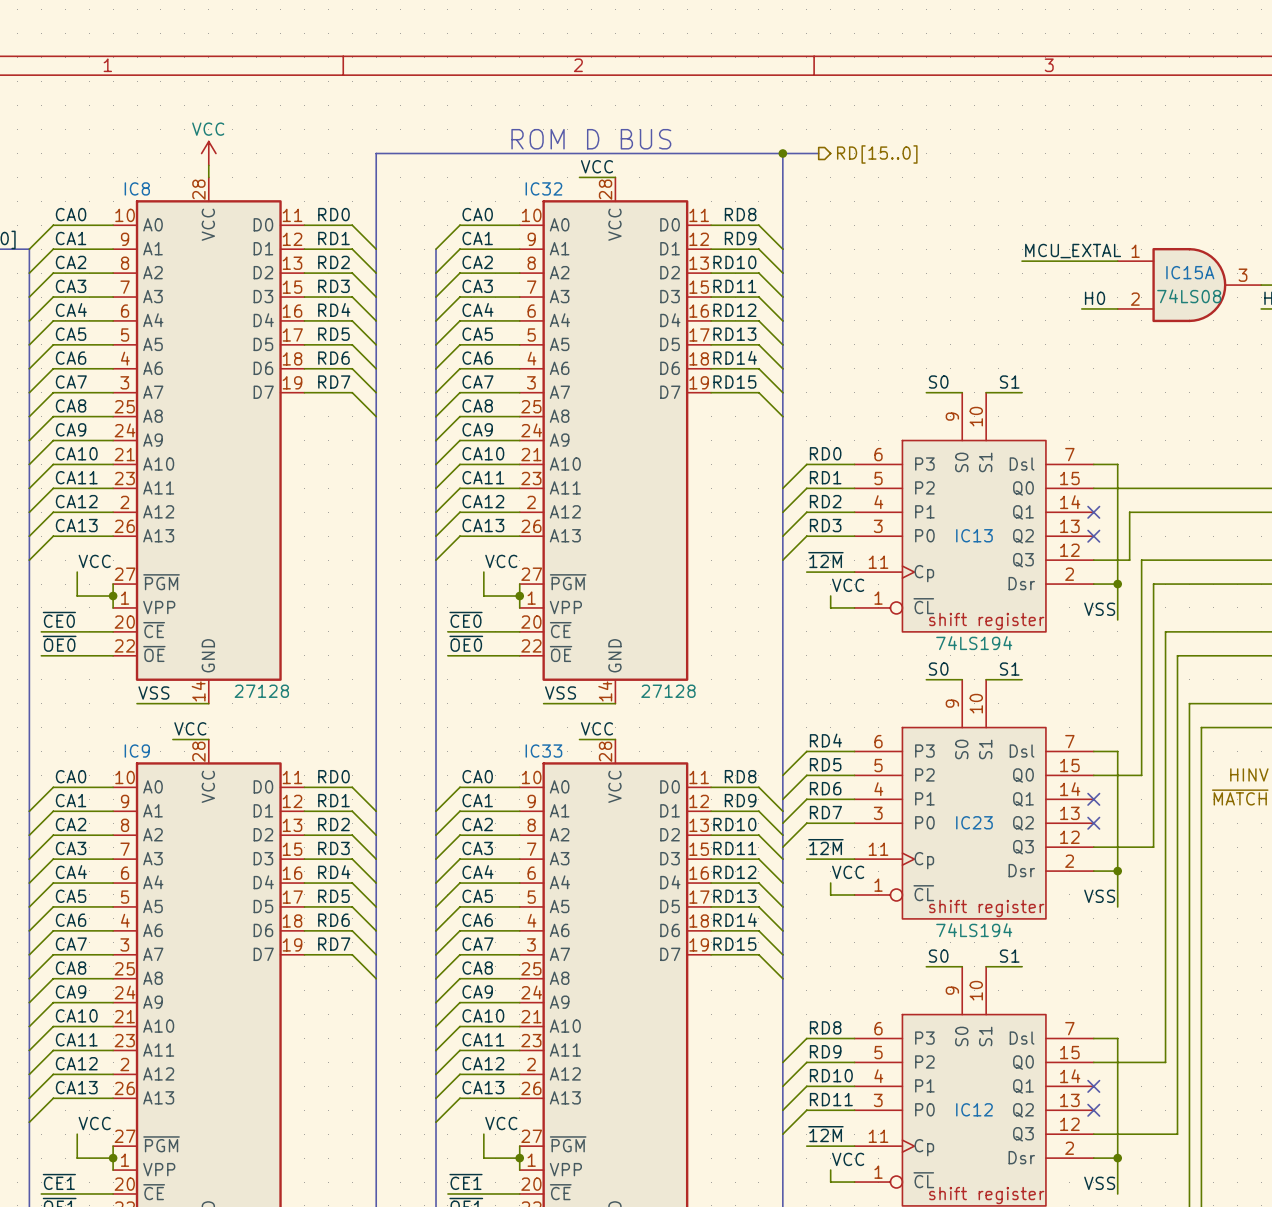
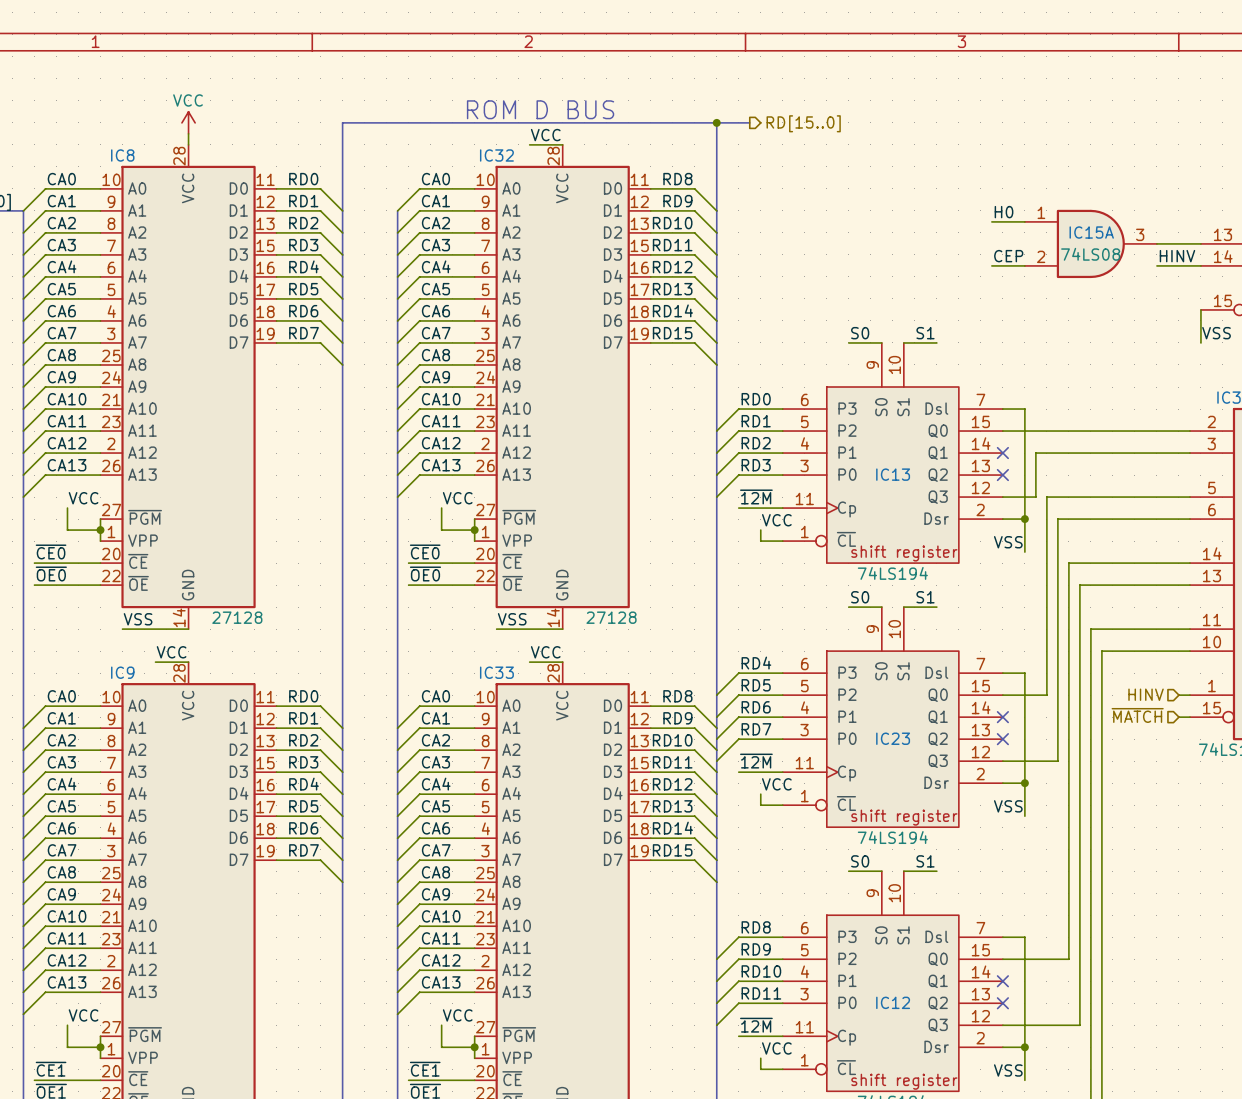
label: none -> H0 (1004, 212)
label: MCU_EXTAL (1073, 251) -> none
wire: (1022, 261) (1081, 261) -> none
label: H0 (1095, 298) -> CEP (1008, 256)

